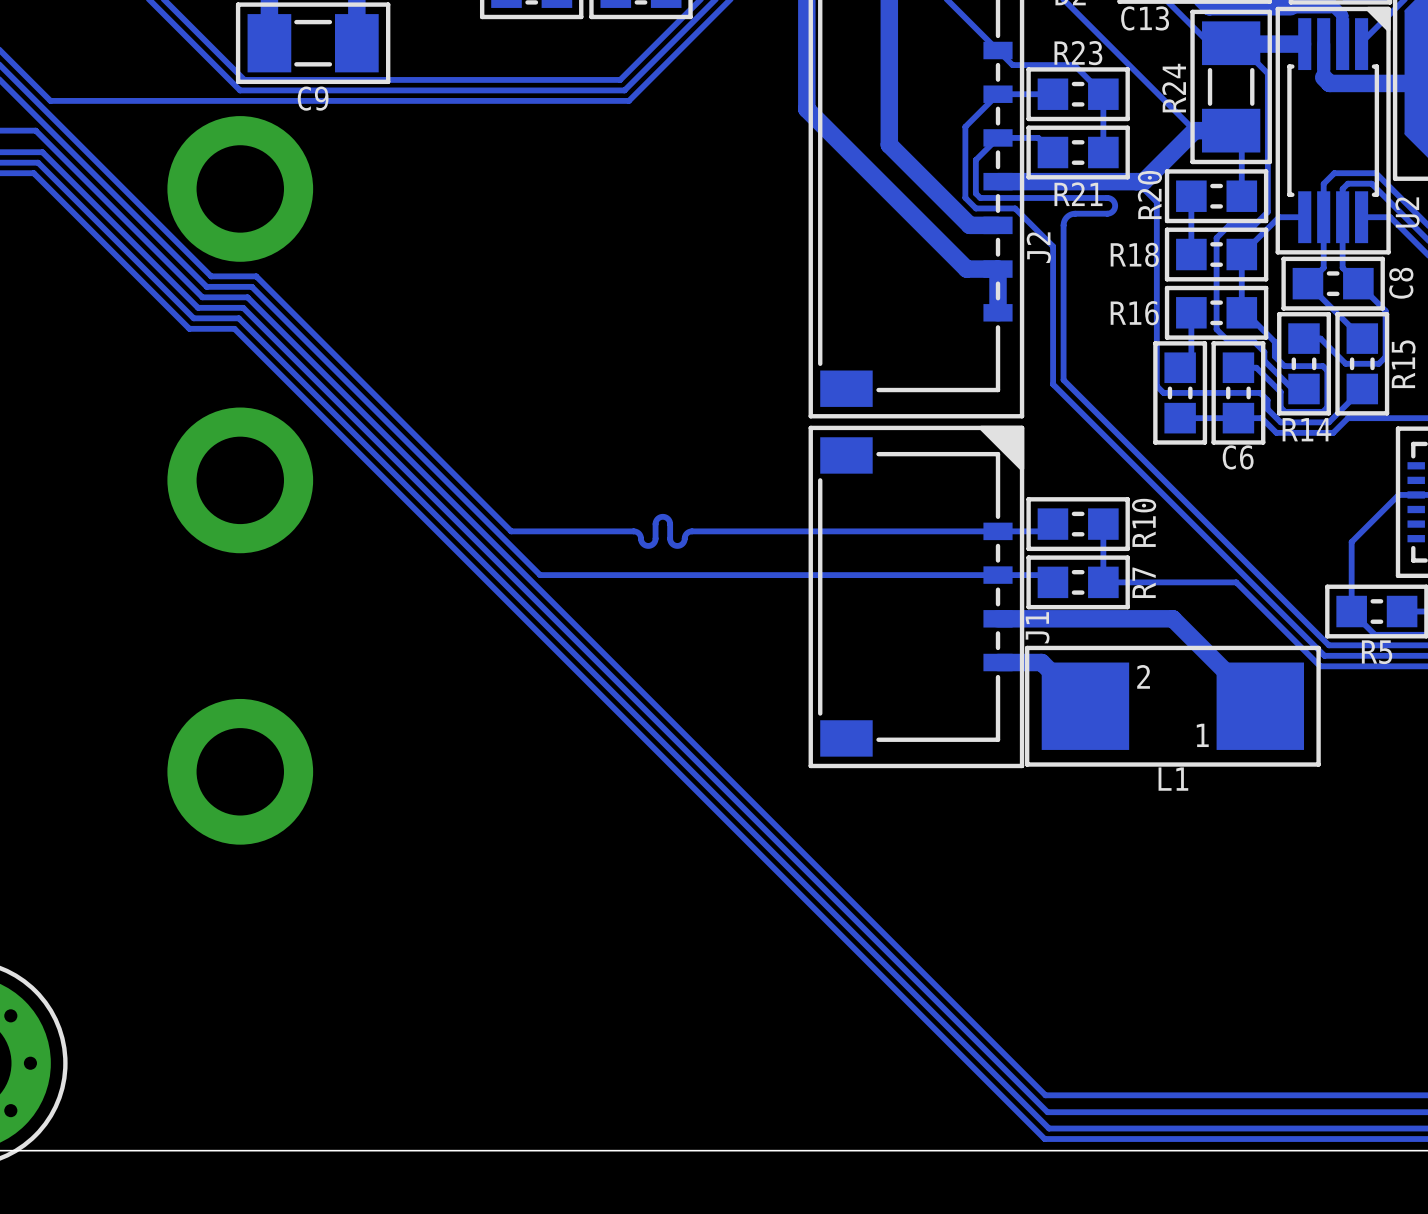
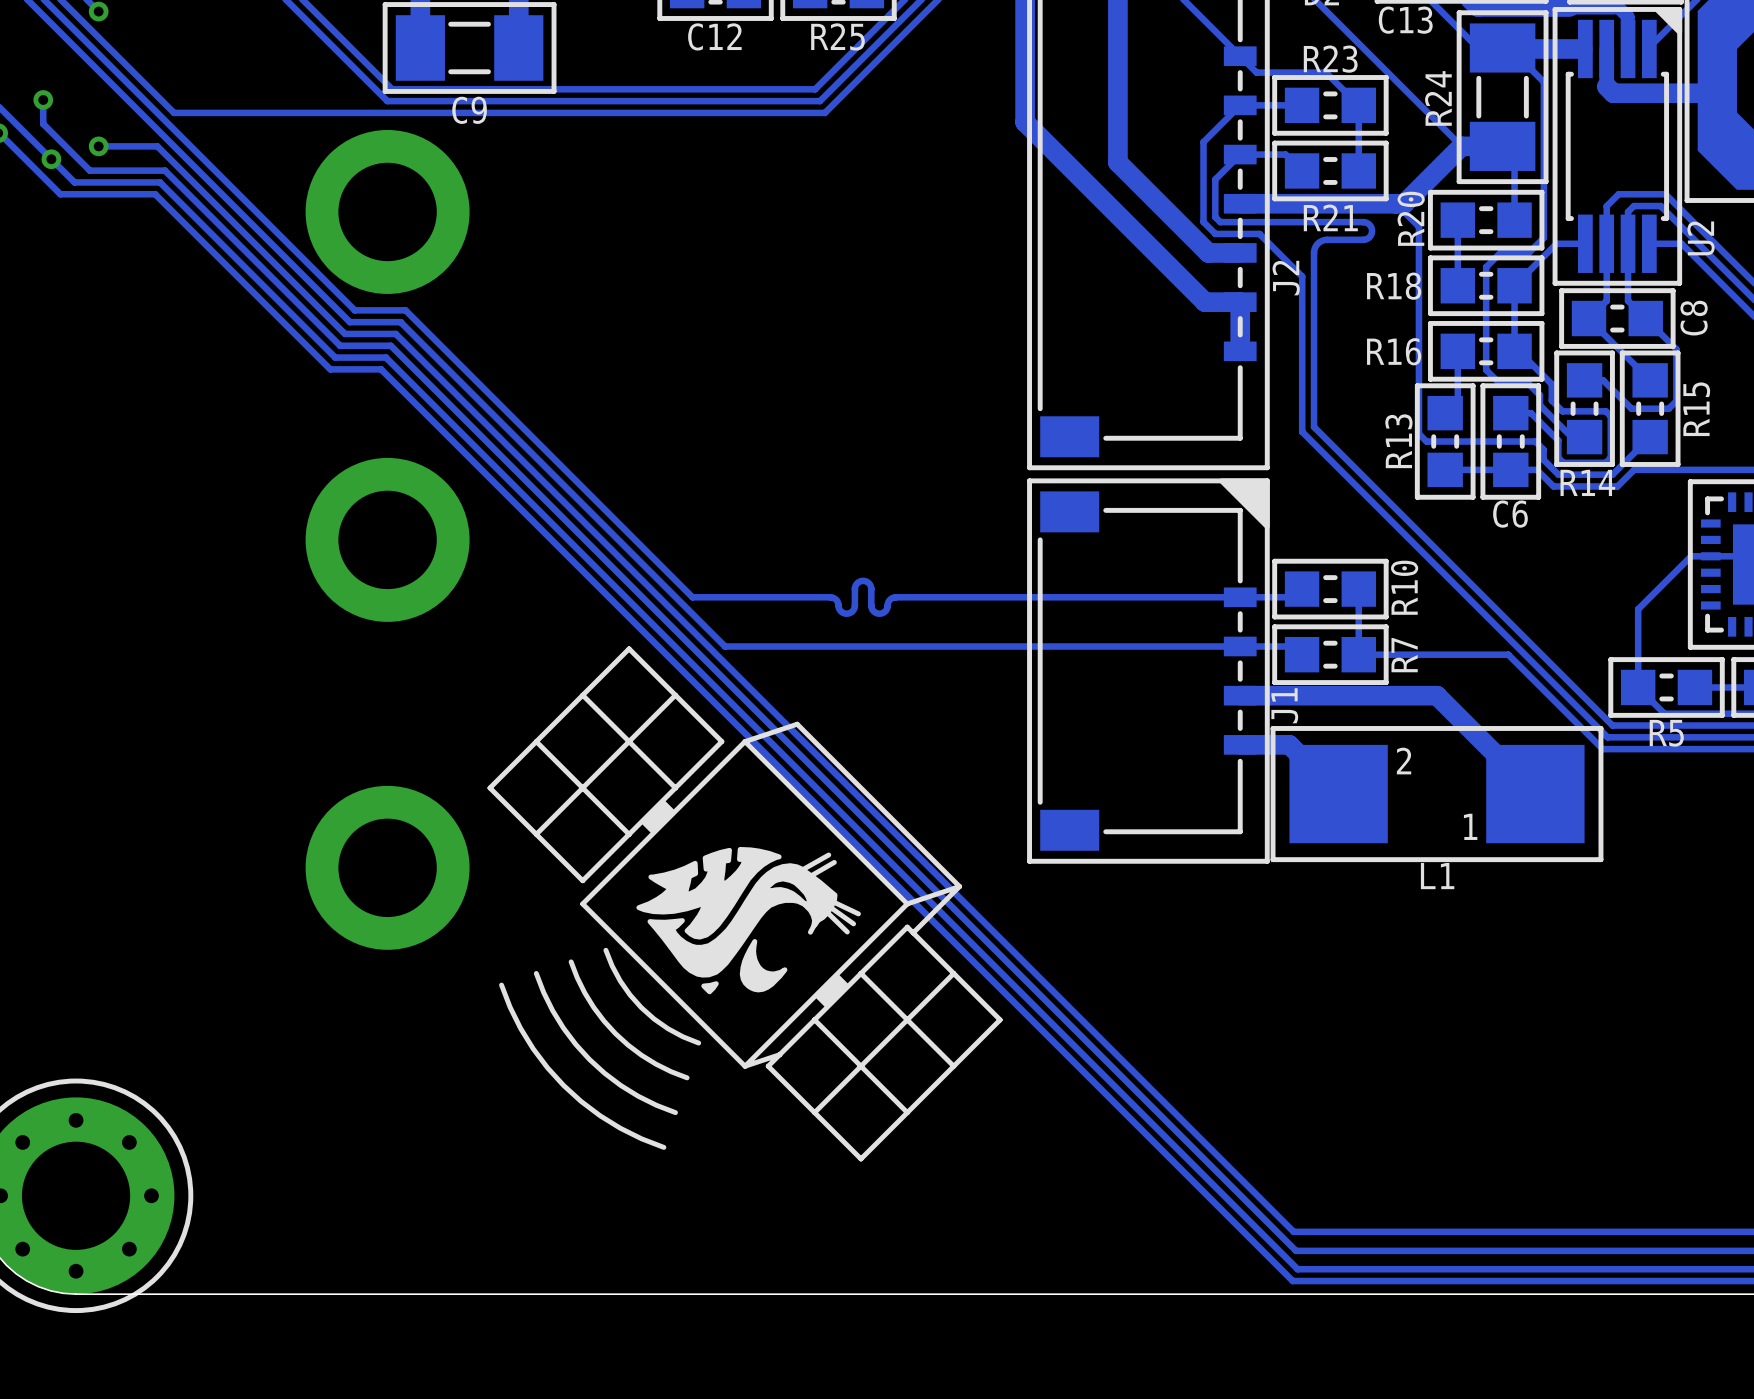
C12 name: none -> C12 (714, 36)
R25 name: none -> R25 (837, 36)
R13 name: none -> R13 (1398, 441)
drawing: none -> [487, 646, 1003, 1162]

